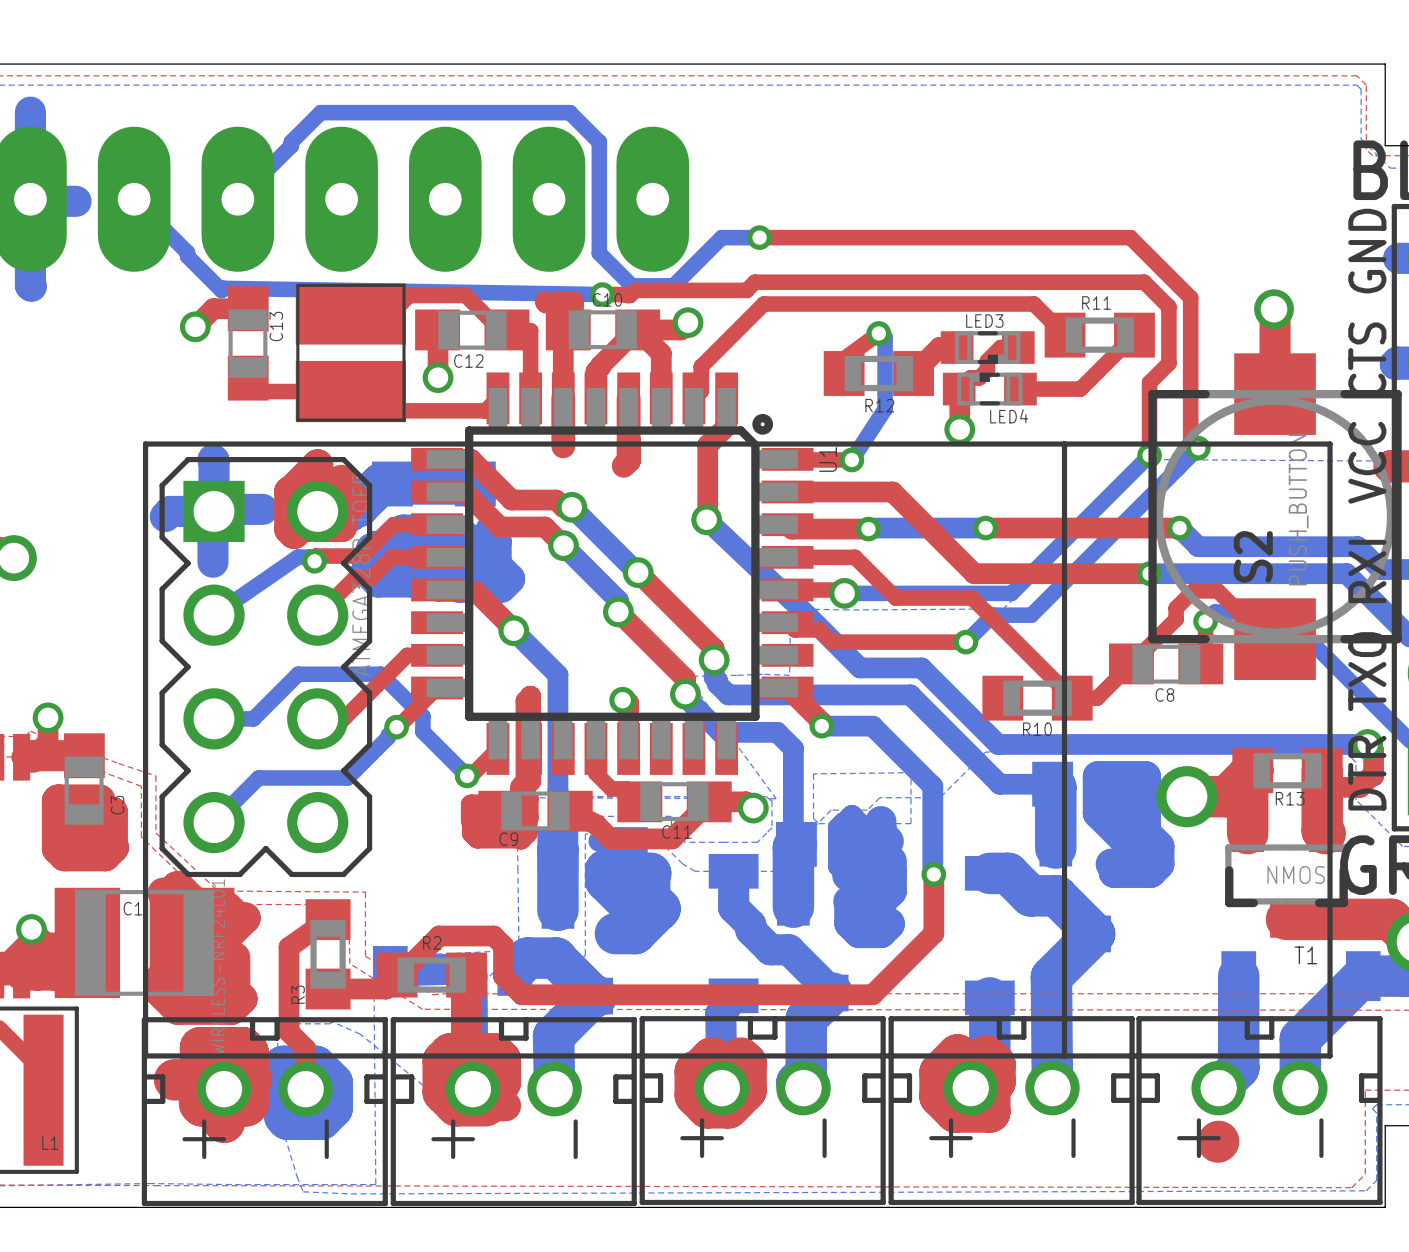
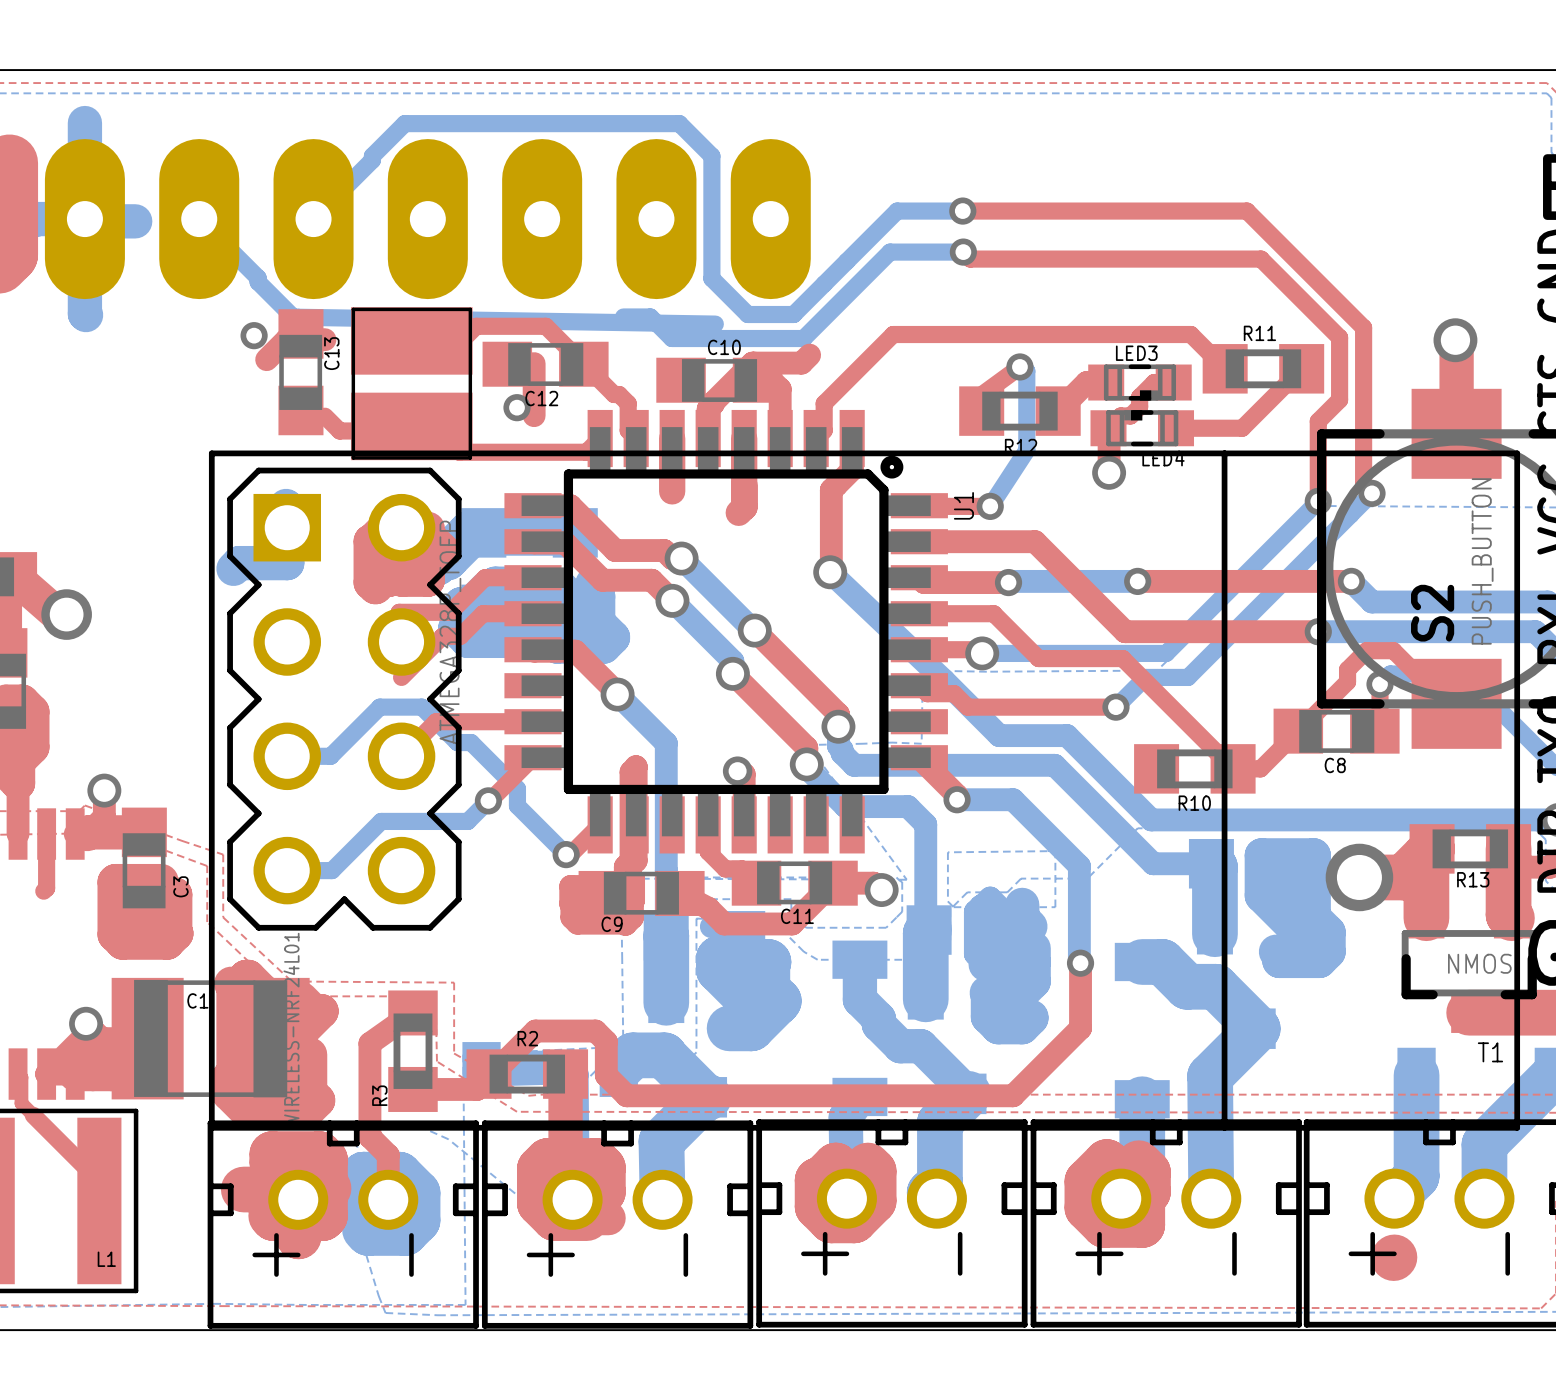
via: none -> (962, 211)
bottom track: none -> (963, 252) (890, 252) (803, 338) (671, 338) (650, 316) (623, 316)
via: none -> (963, 252)
bottom track: (721, 237) (759, 237) -> (846, 261) (897, 211) (962, 211)
top track: (759, 237) (1130, 237) -> (962, 211) (1246, 211) (1297, 261)
via: (759, 237) -> none
top track: (1144, 282) (754, 282) (746, 290) (635, 290) (630, 295) (602, 294) -> (1312, 310) (1261, 259) (970, 259) (963, 252)
via: (602, 294) -> none
top track: (545, 301) (573, 301) (573, 324) (563, 334) (563, 398) -> none
top track: (350, 313) (390, 313) (409, 295) (465, 295) (500, 329) (530, 330) (530, 398) -> (411, 340) (461, 340) (476, 326) (545, 326) (614, 394) (619, 394) (628, 403) (628, 430) (636, 438)
via: (688, 322) -> none
via position: (195, 326) -> (254, 335)
C12 position: (472, 329) -> (545, 364)
C10 position: (602, 329) -> (719, 380)
C13 position: (248, 343) -> (300, 372)
part position: (350, 352) -> (411, 383)
via position: (438, 377) -> (517, 407)
bottom track: (262, 509) (216, 509) (212, 512) (212, 562) -> none
bottom track: (314, 561) (310, 557) (297, 557) (214, 615) -> none
via: (314, 561) -> none
top track: (407, 655) (343, 718) (317, 718) -> (500, 721) (436, 721) (401, 756)
bottom track: (368, 674) (298, 674) (253, 718) (214, 718) -> (457, 742) (421, 707) (379, 707) (330, 756) (287, 756)
bottom track: (388, 735) (347, 777) (258, 777) (214, 822) -> (479, 809) (467, 821) (381, 821) (331, 870) (287, 870)
part position: (737, 750) -> (864, 790)

